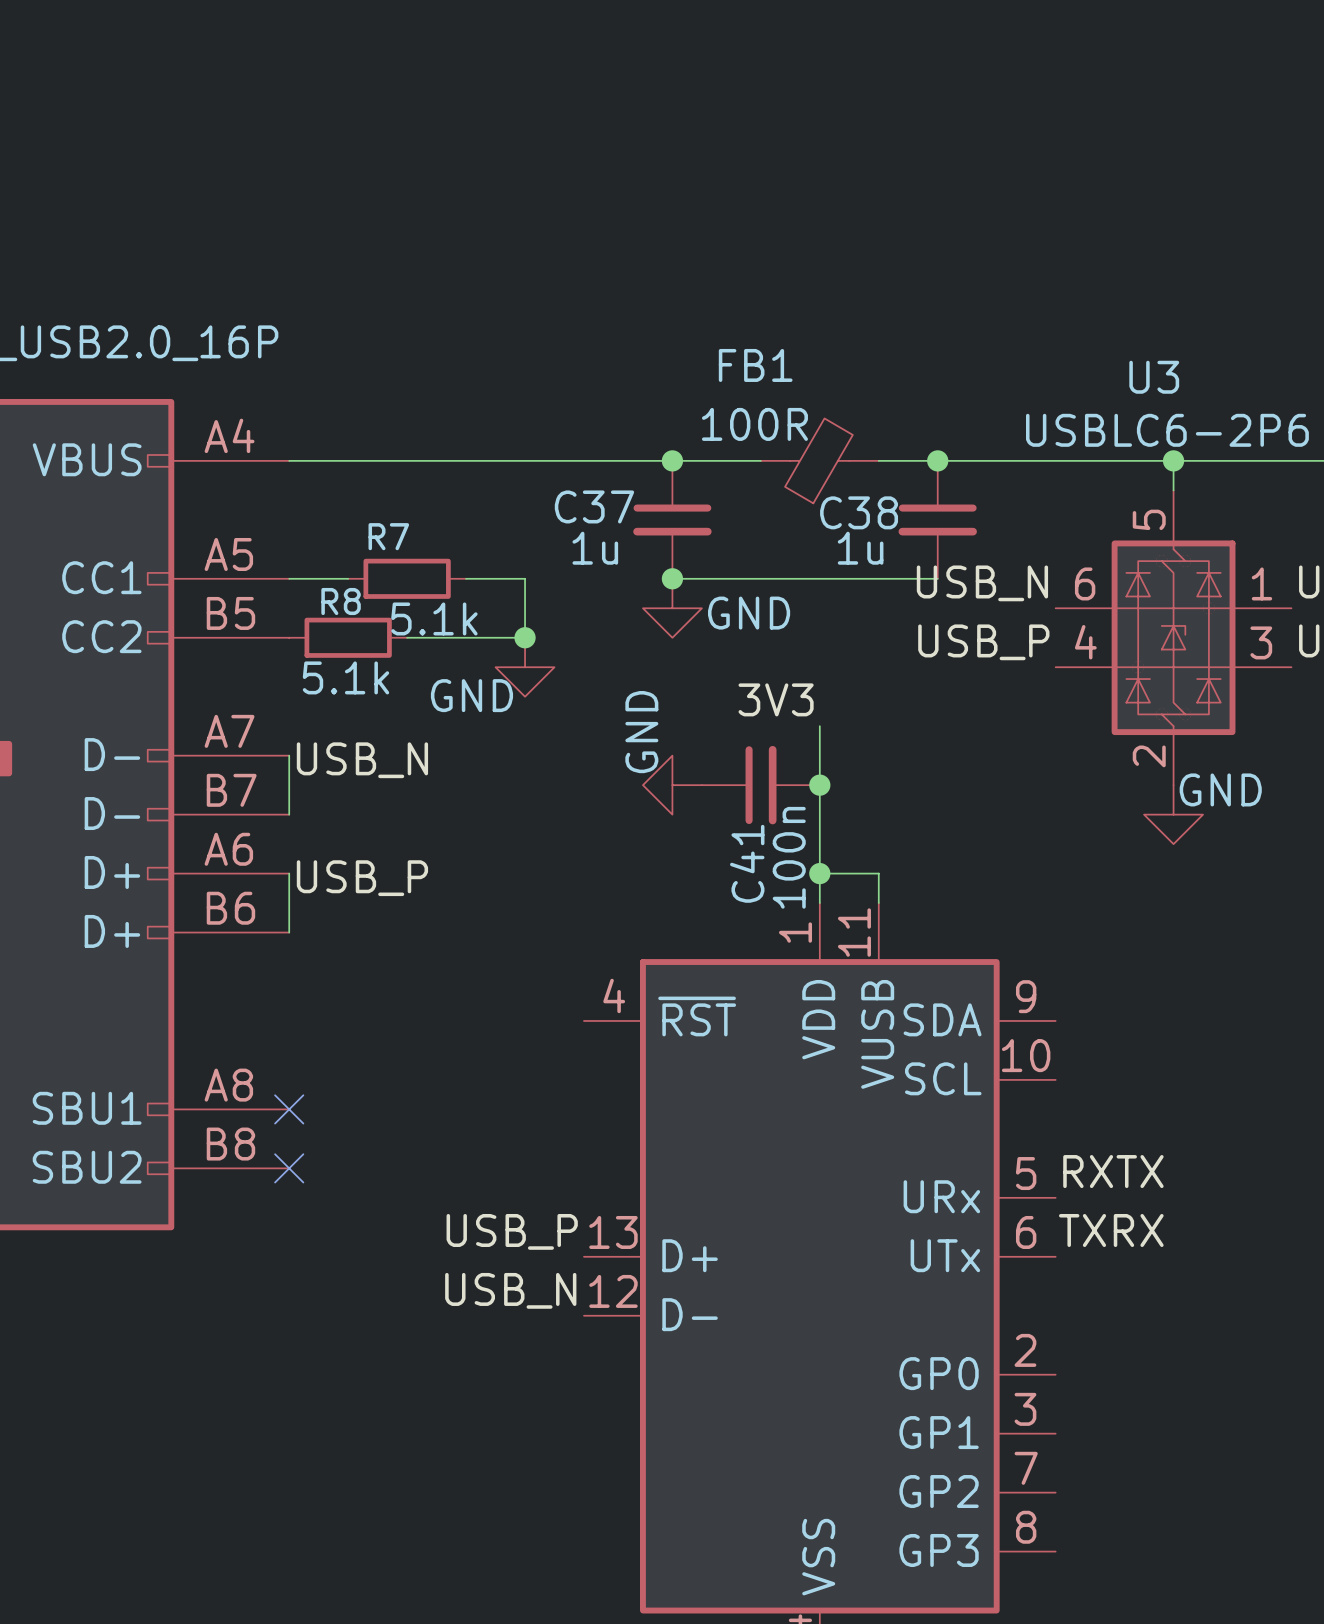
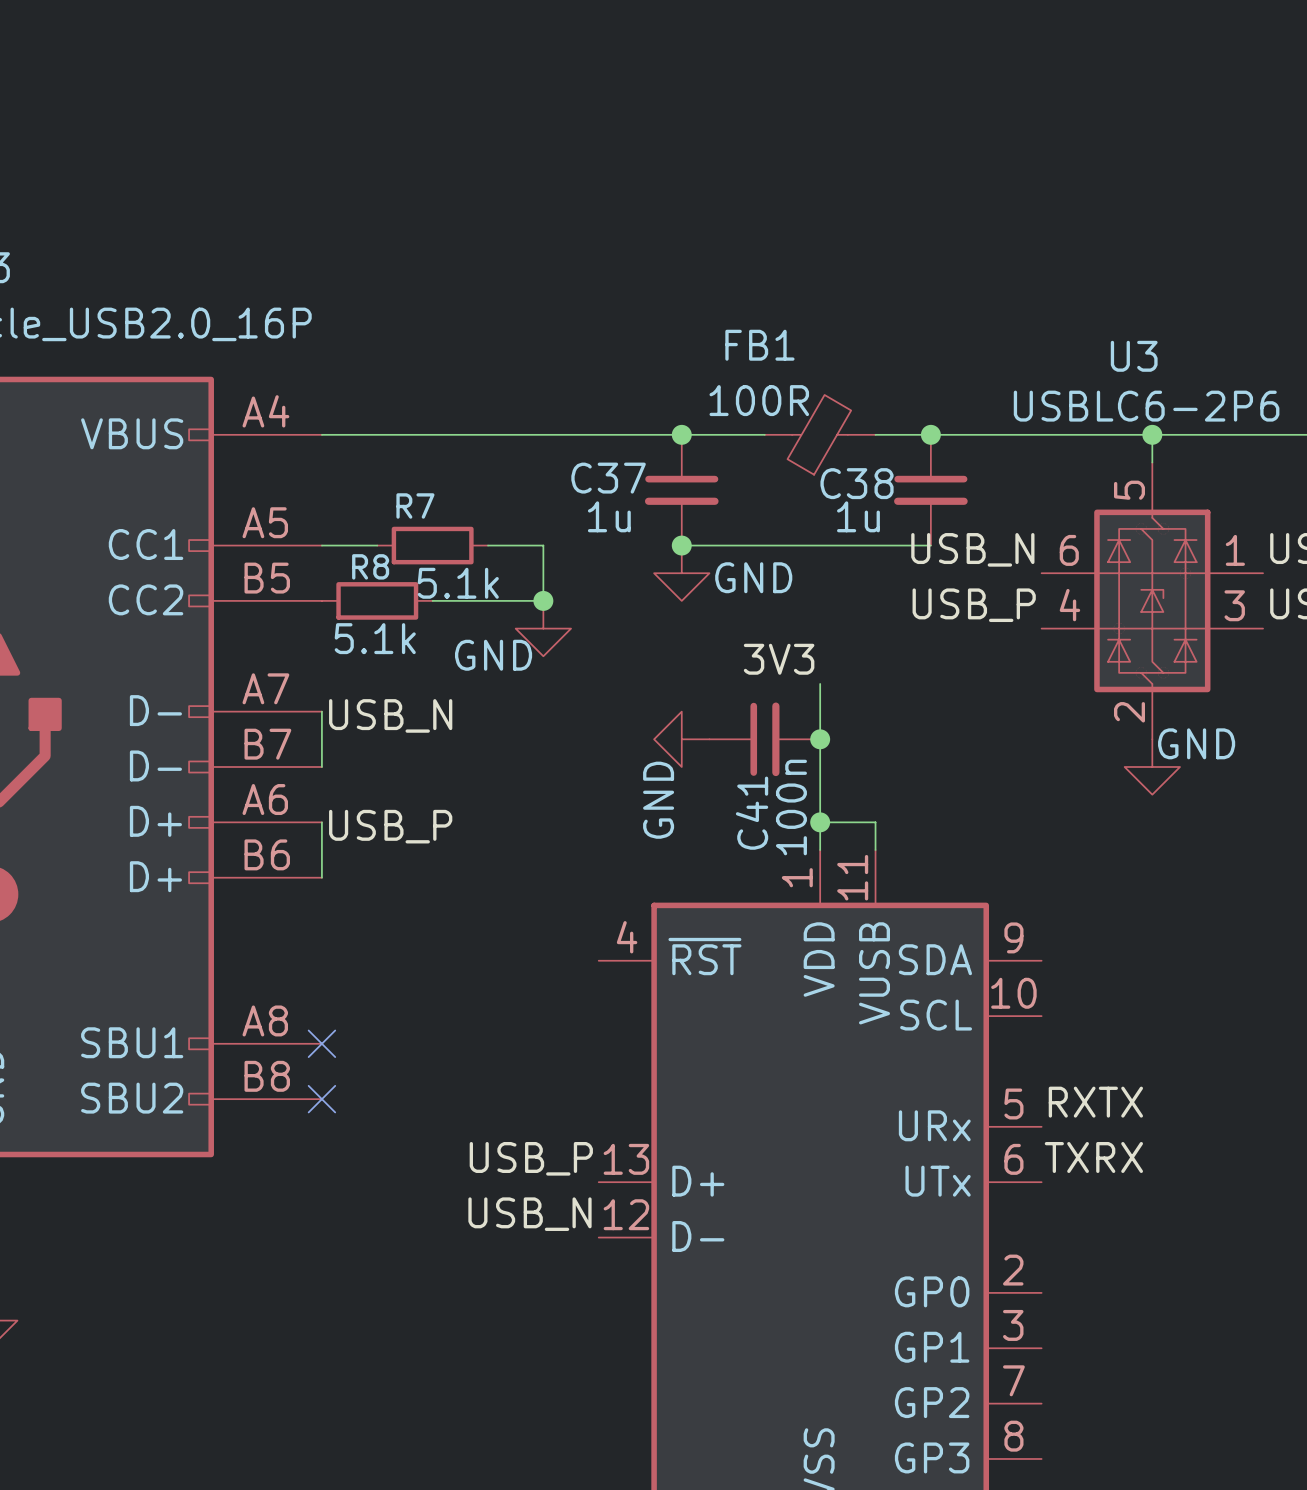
power symbol text position: GND (641, 732) -> GND (658, 800)

